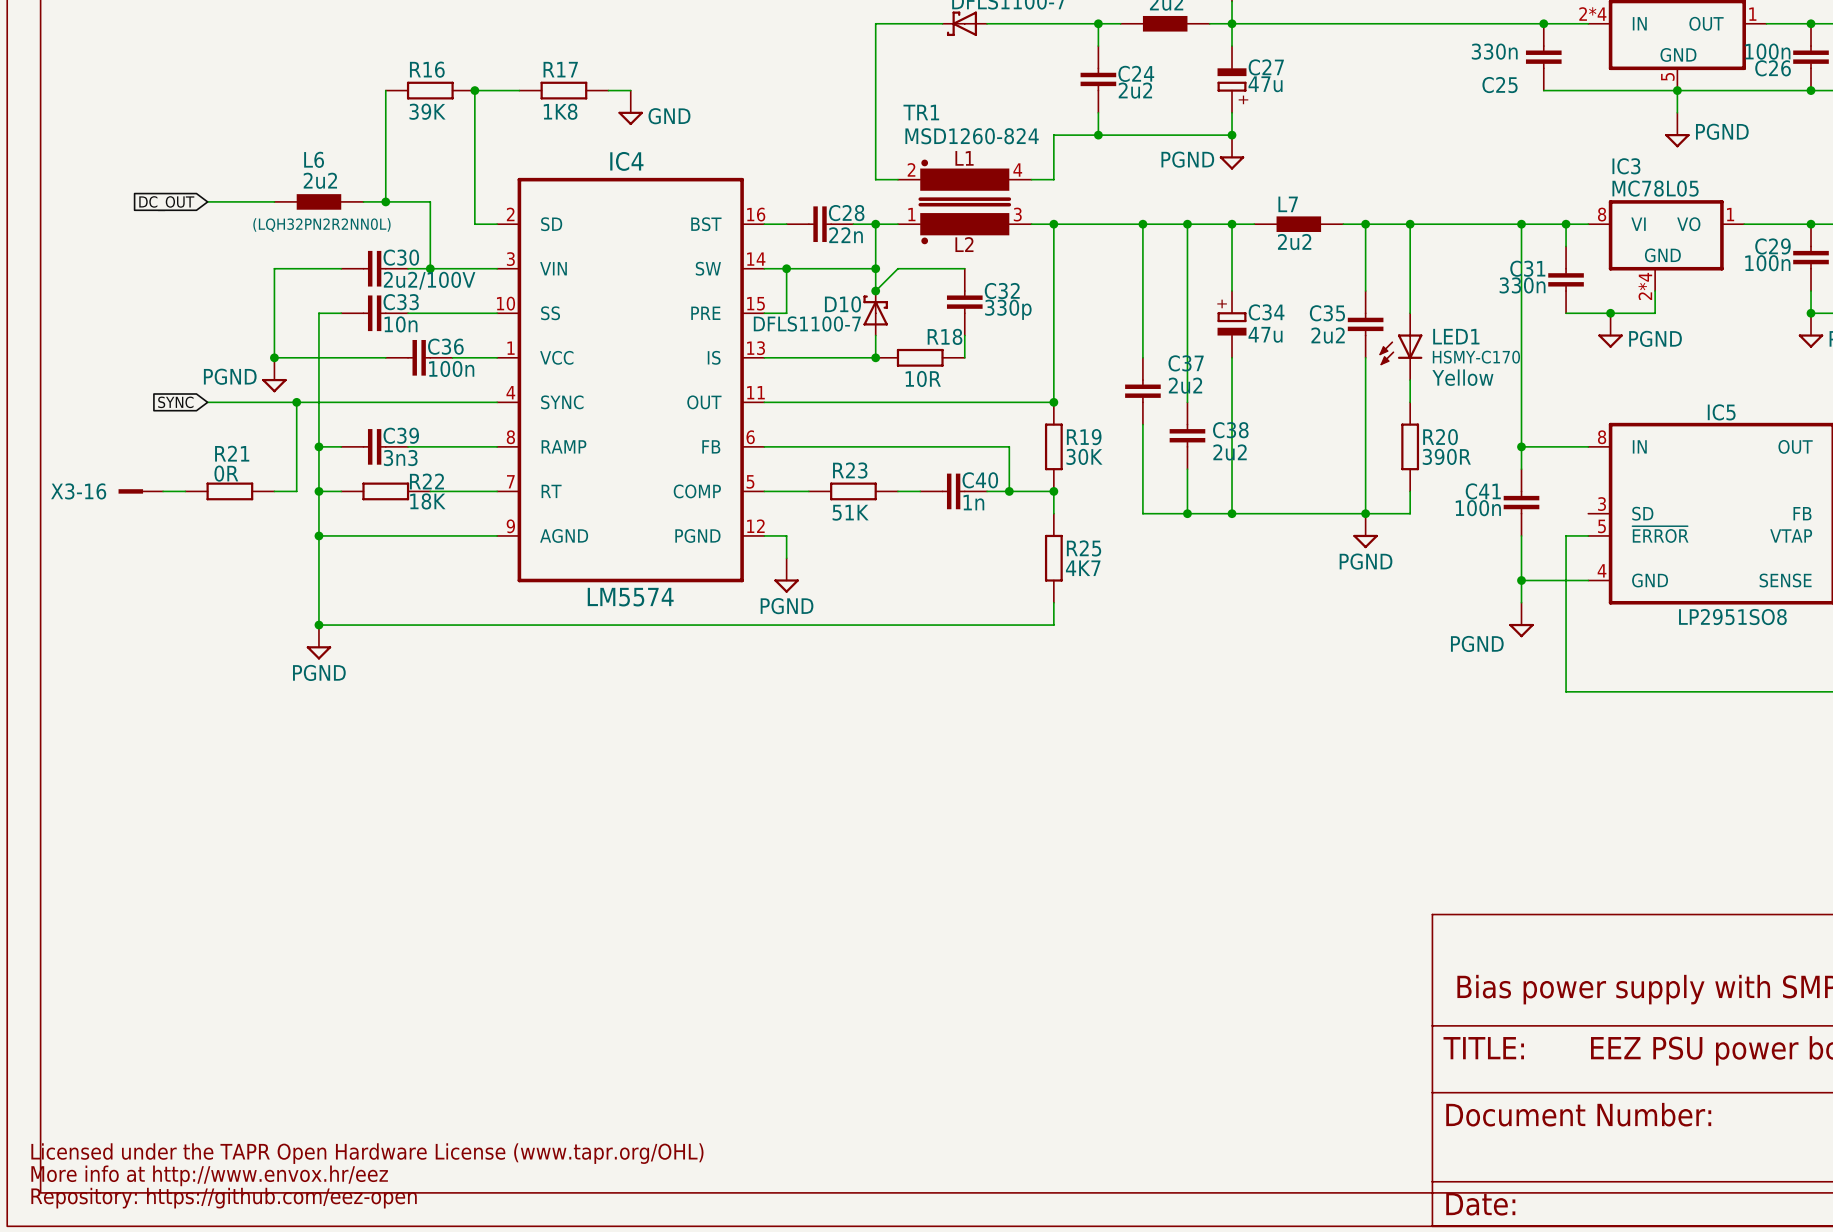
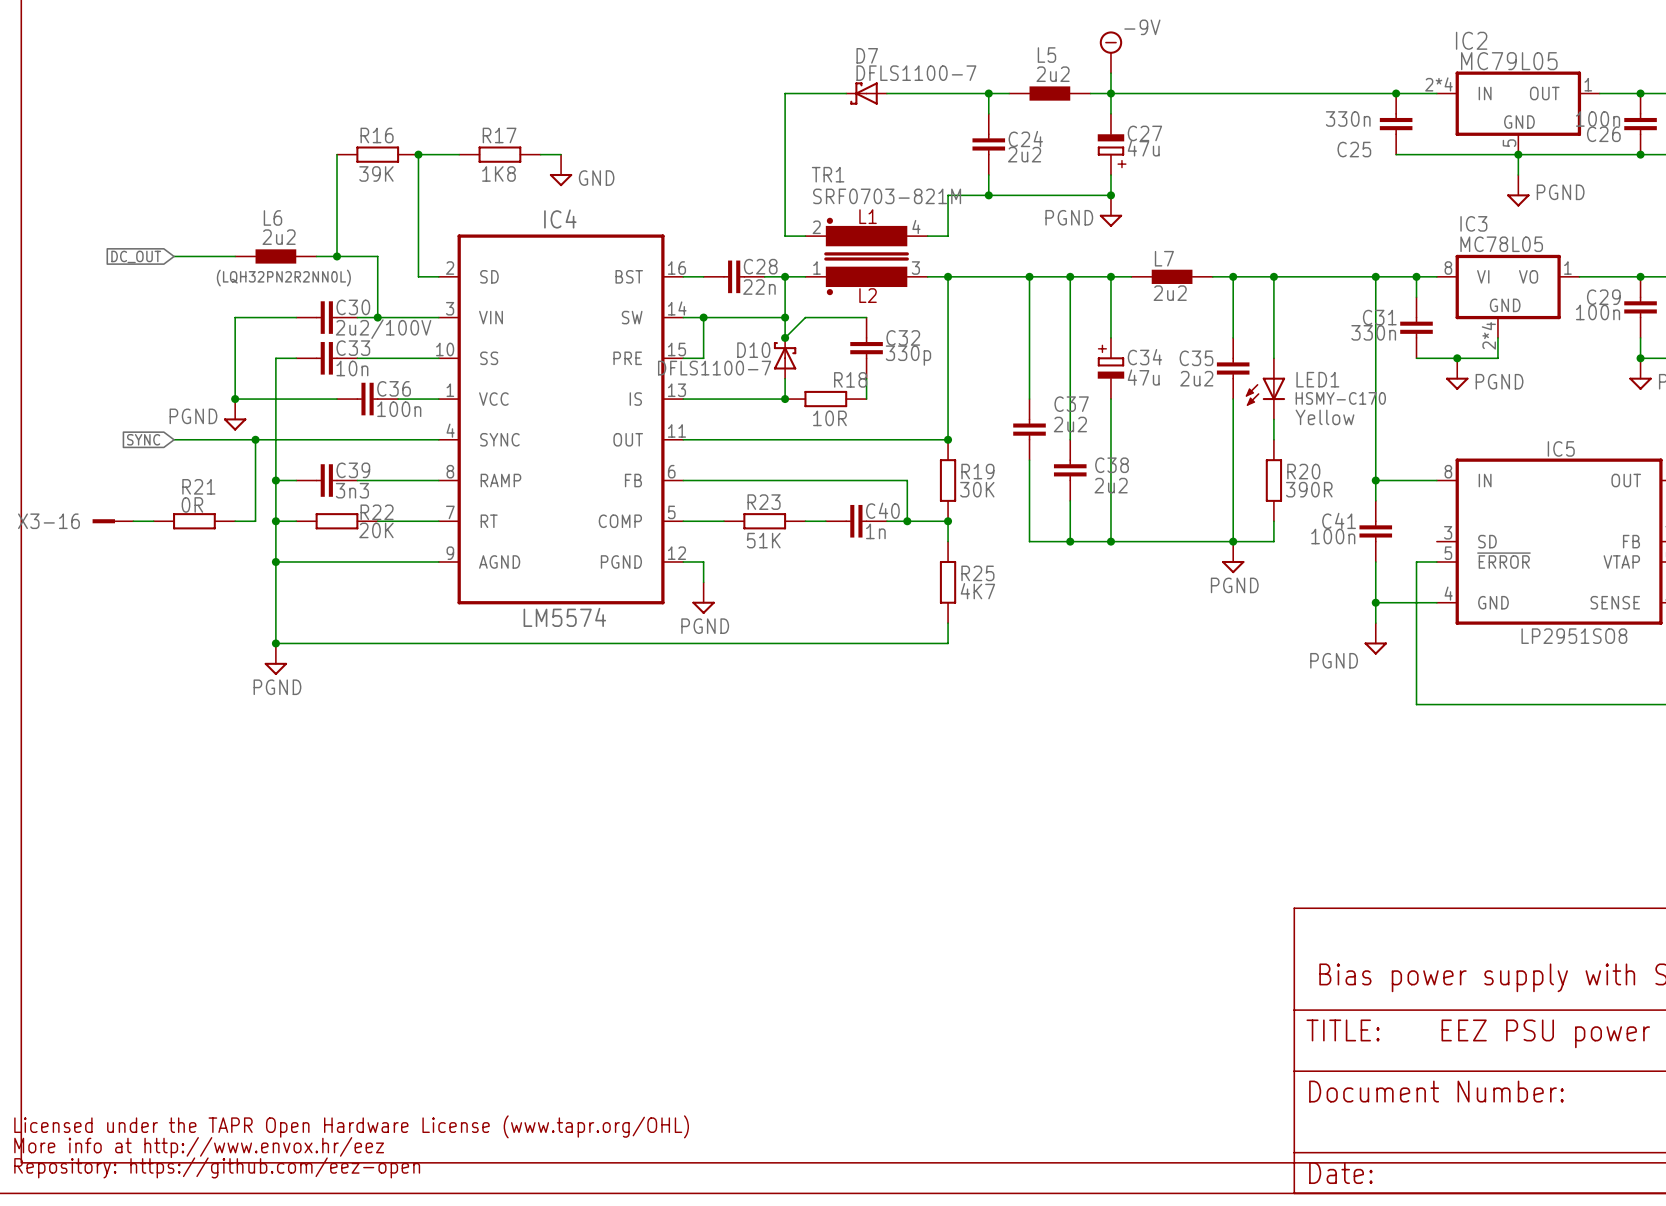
TR1 value: MSD1260-824 (972, 136) -> SRF0703-821M (887, 196)
R22 value: 18K (427, 501) -> 20K (376, 530)

